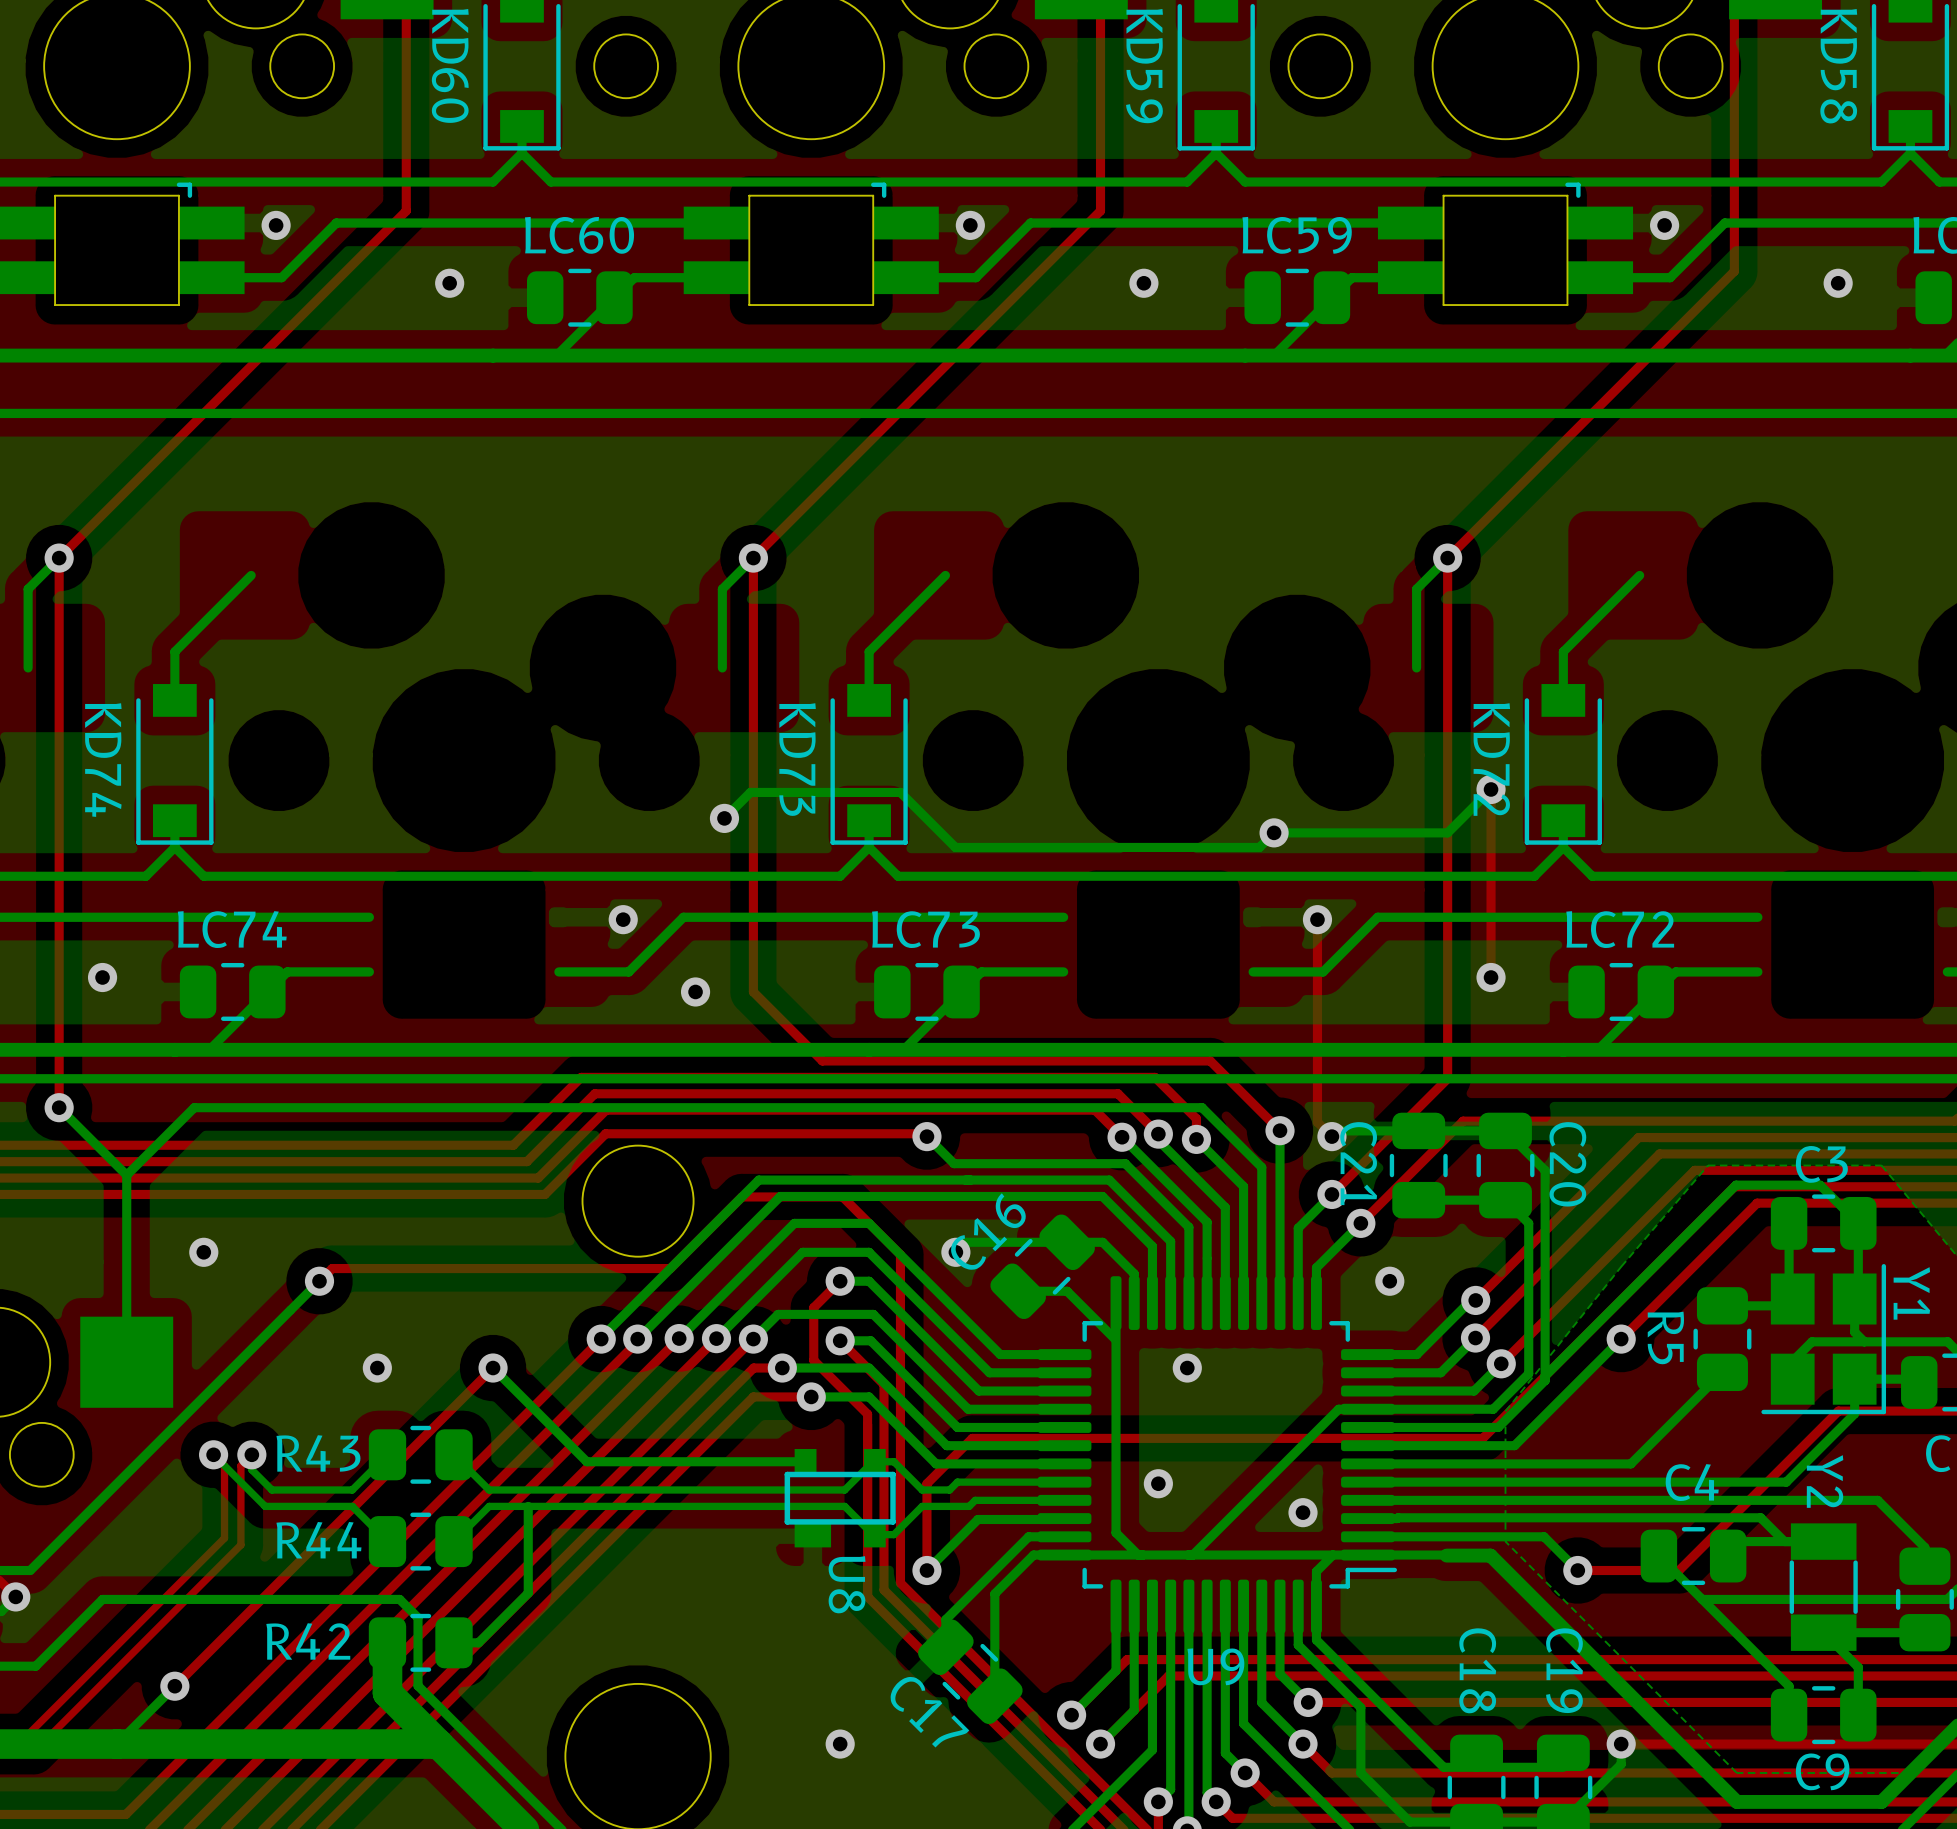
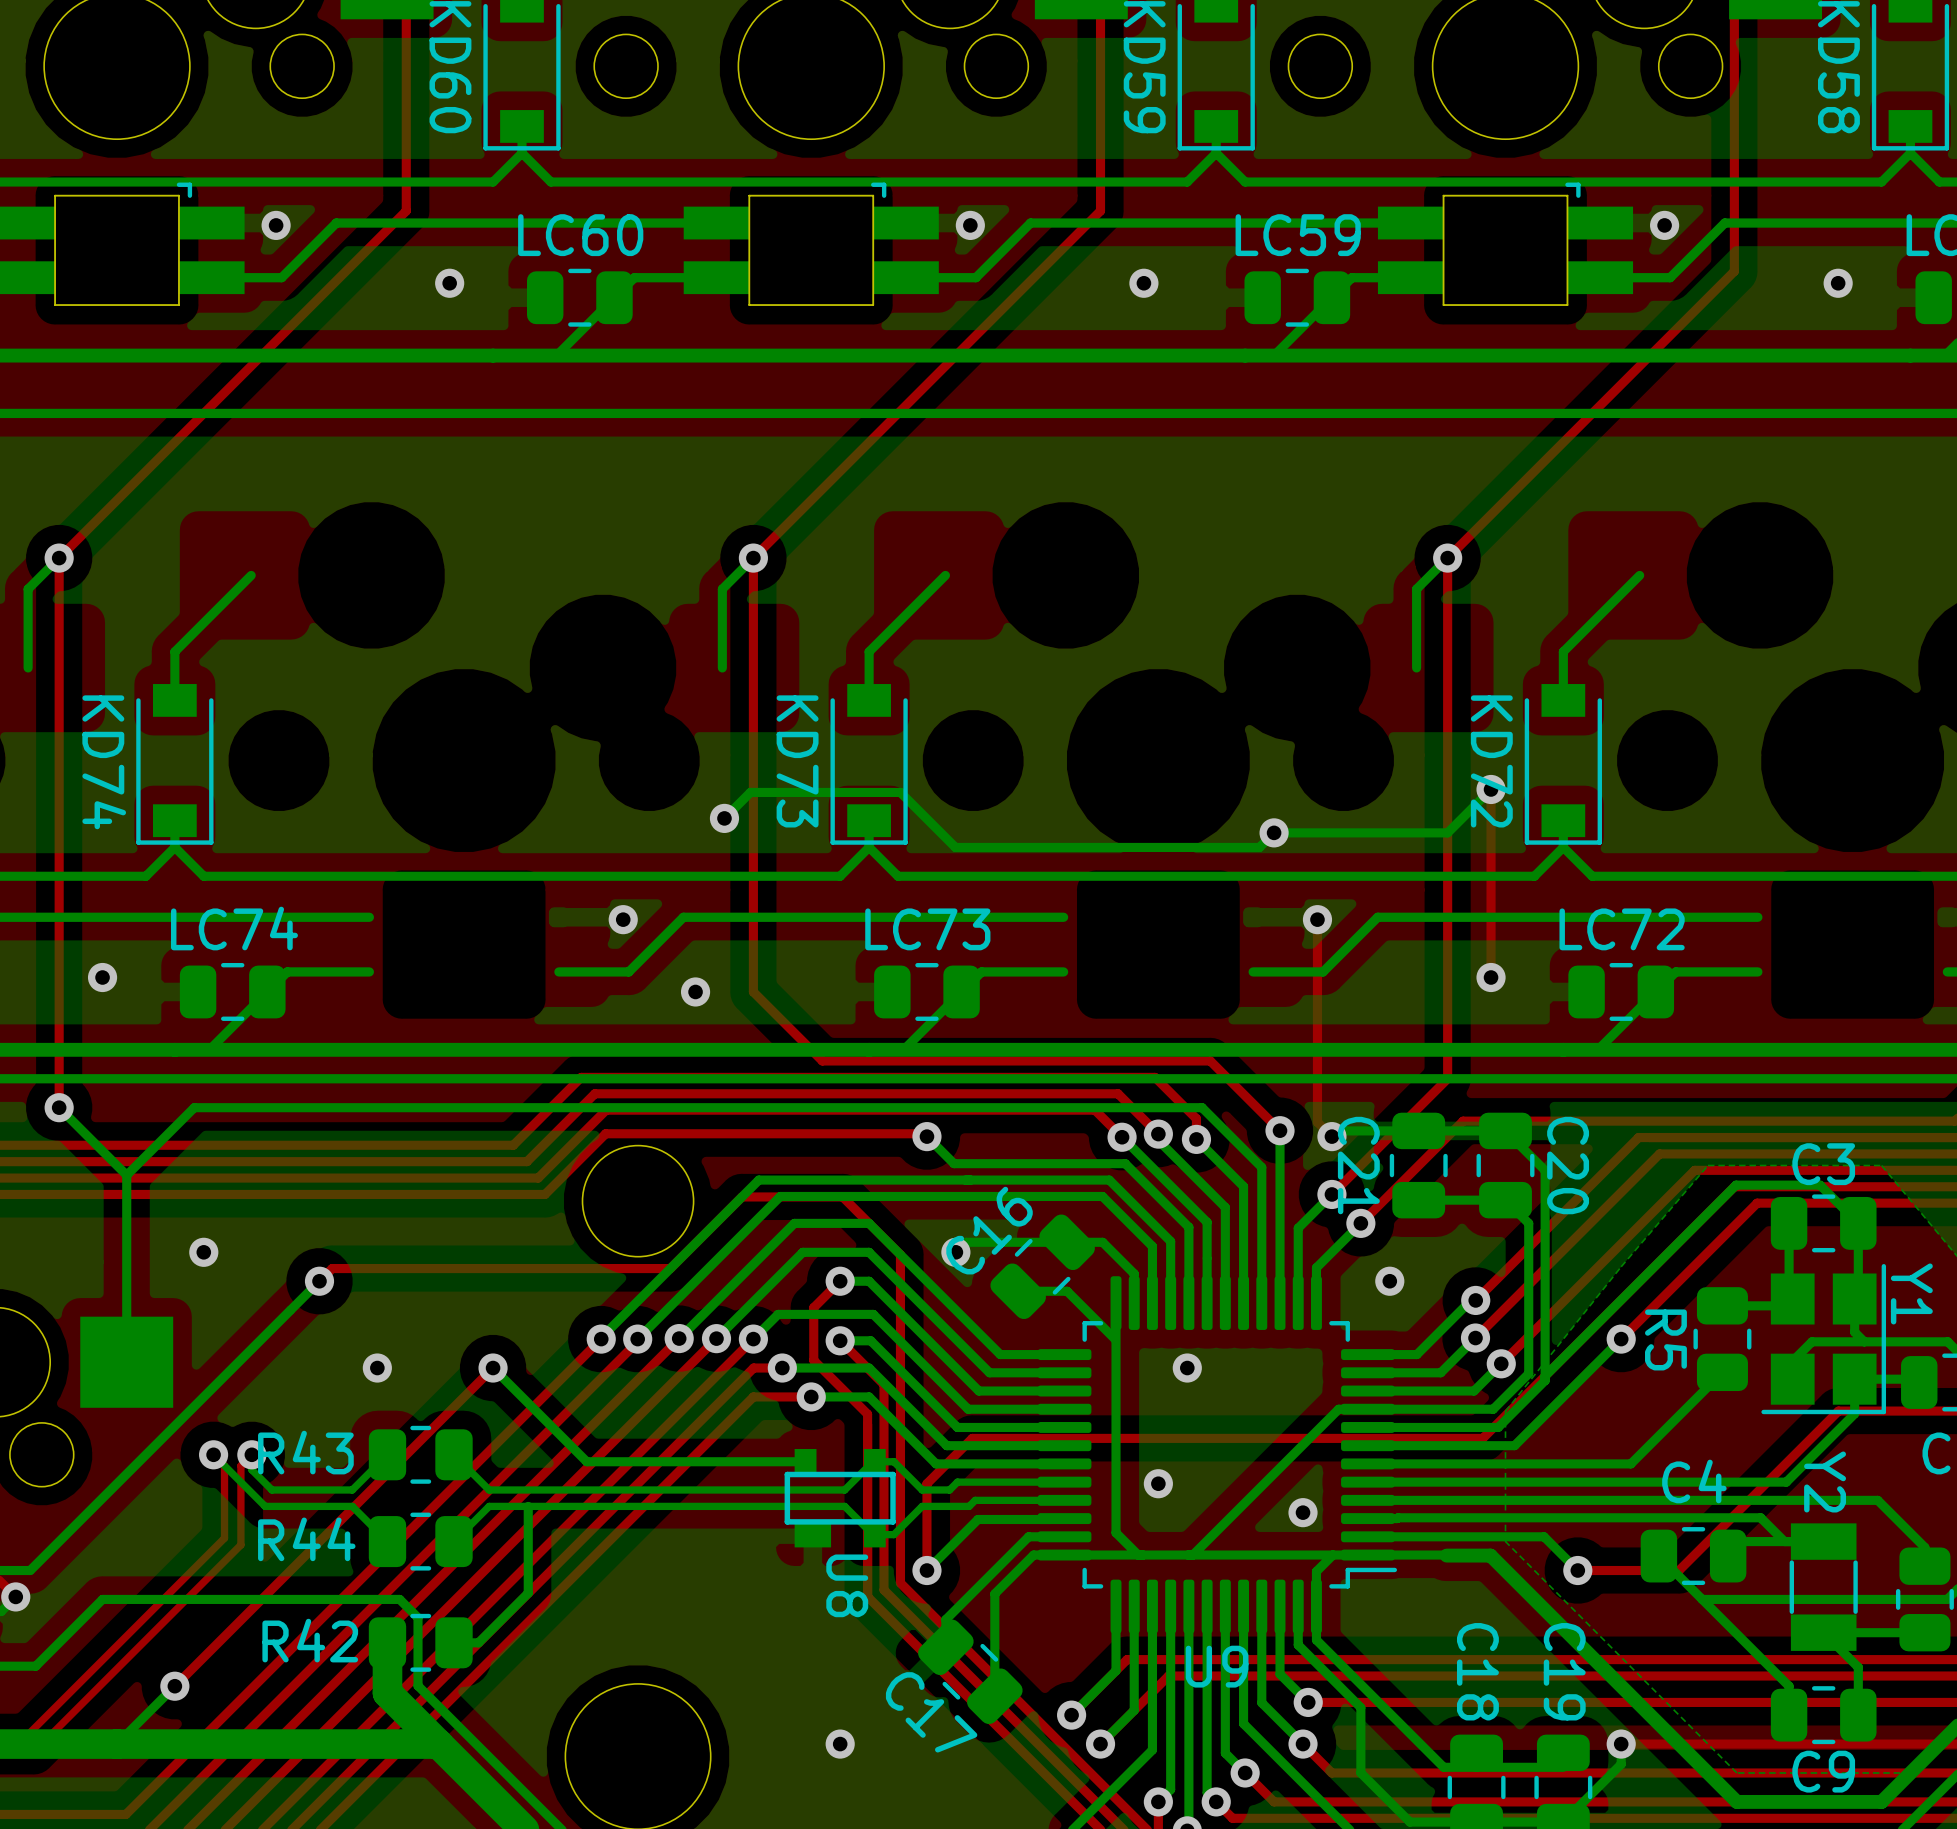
R43 name position: R43 (318, 1453) -> R43 (305, 1452)
R44 name position: R44 (318, 1540) -> R44 (306, 1539)

